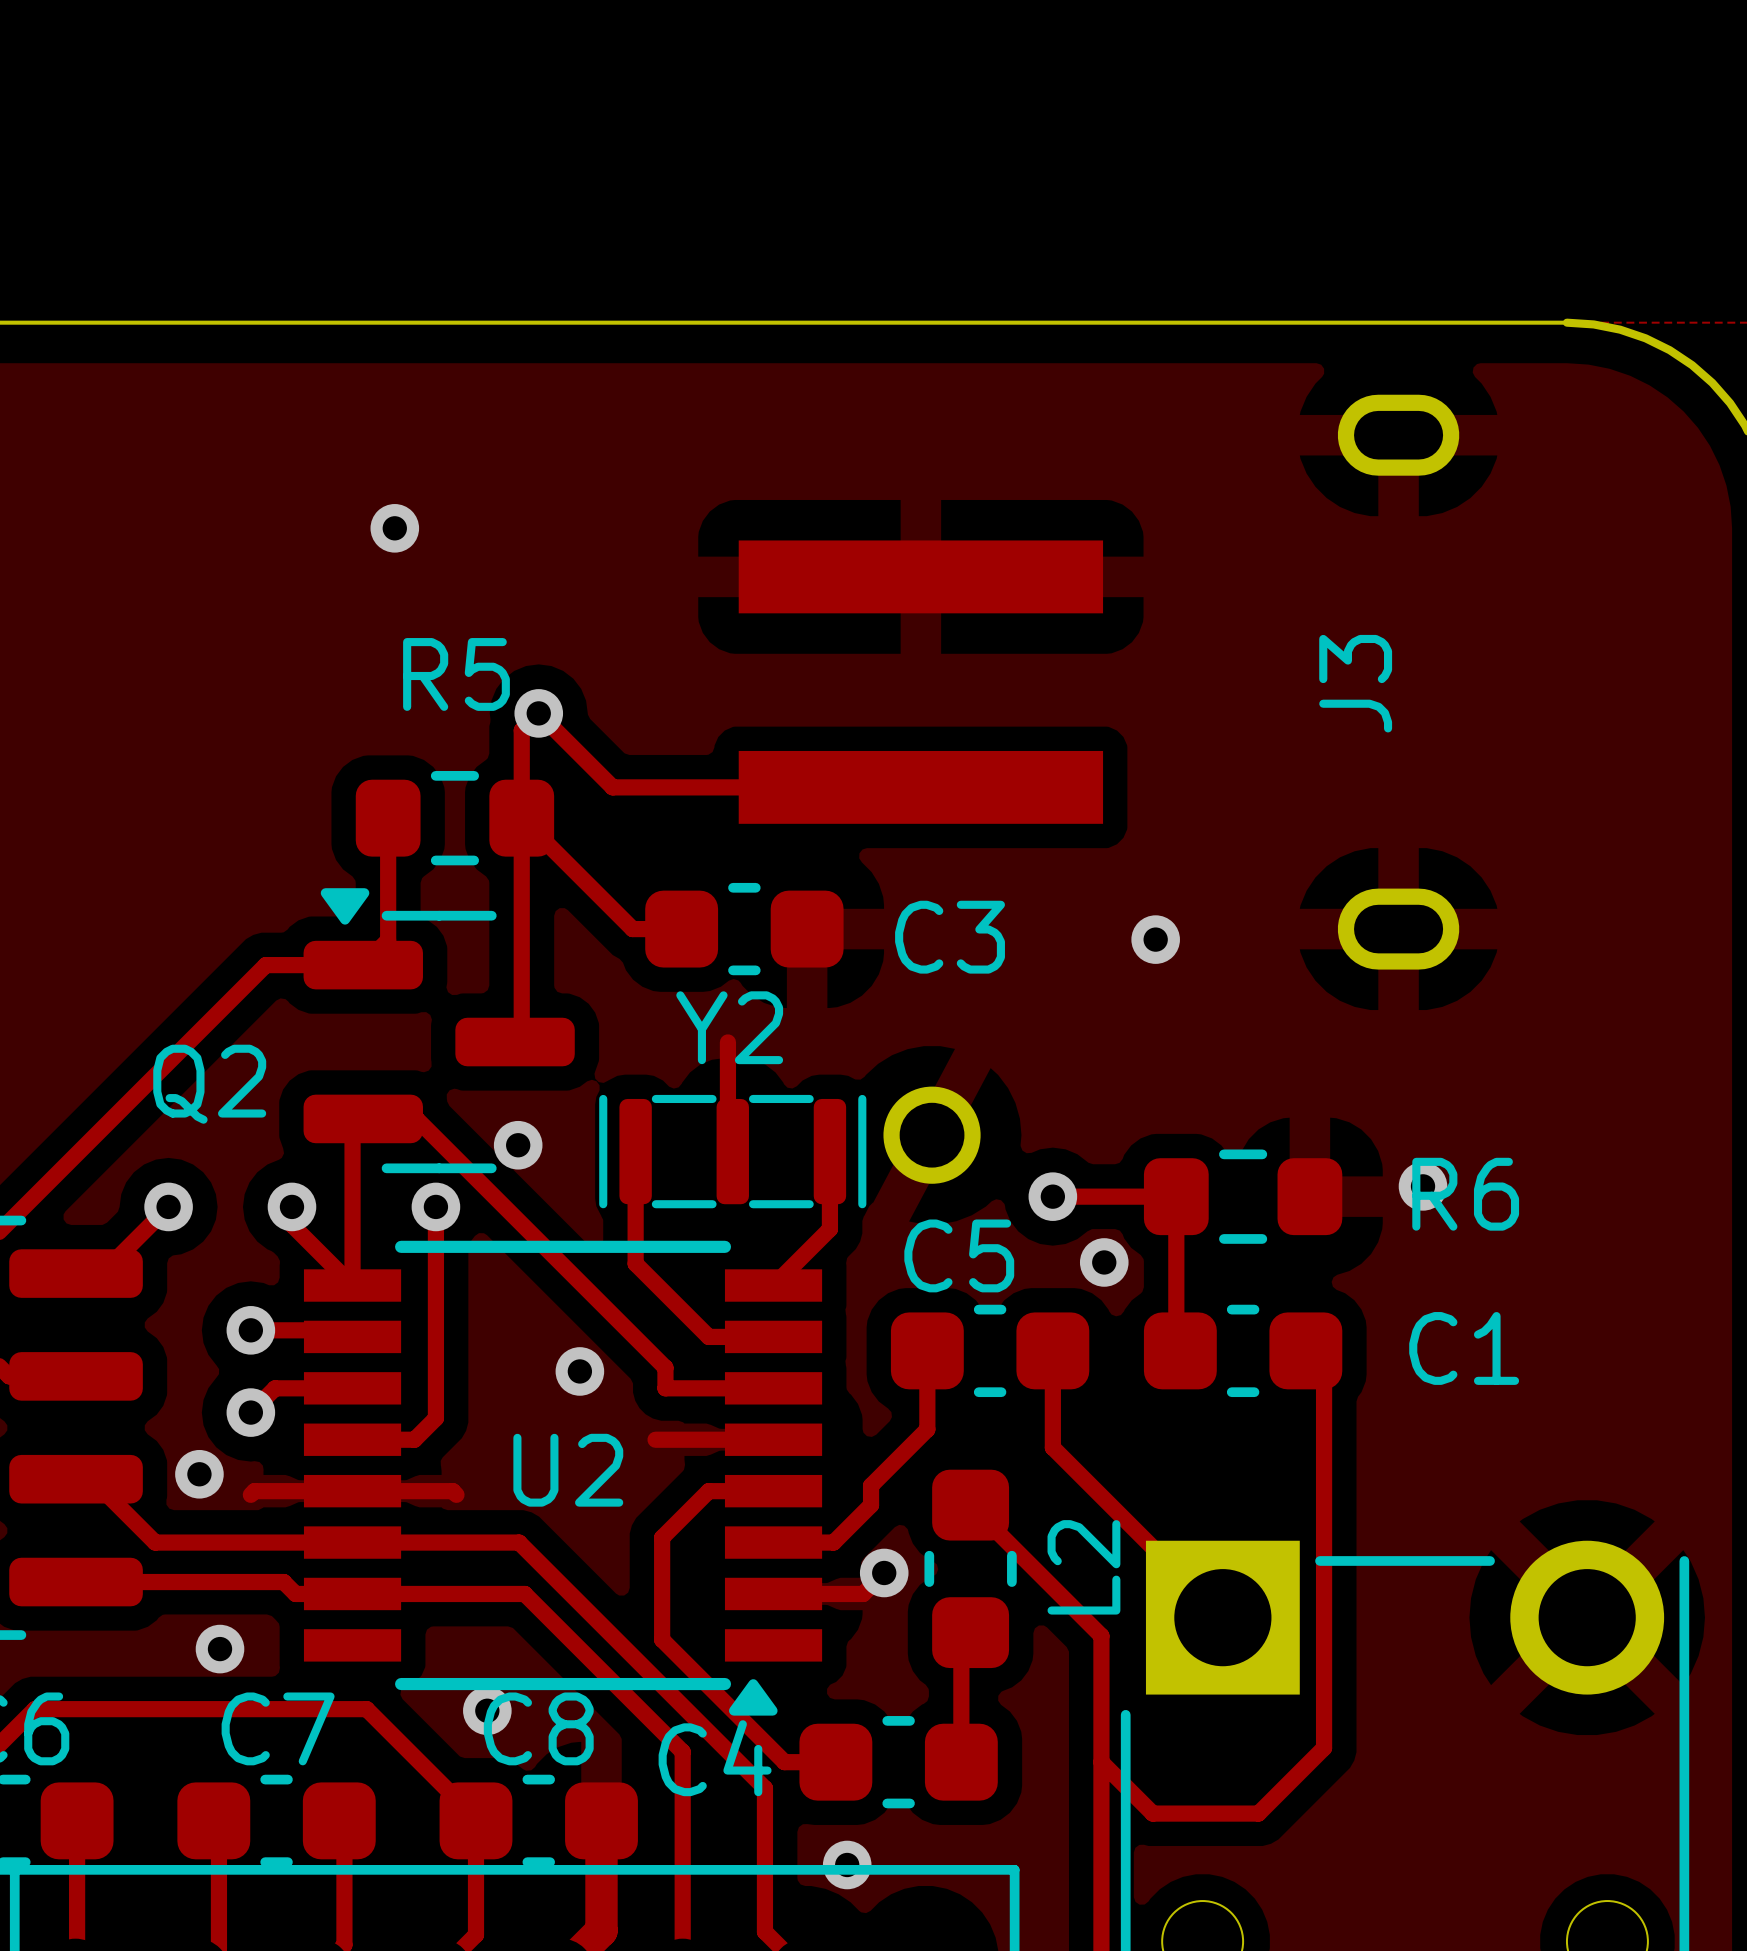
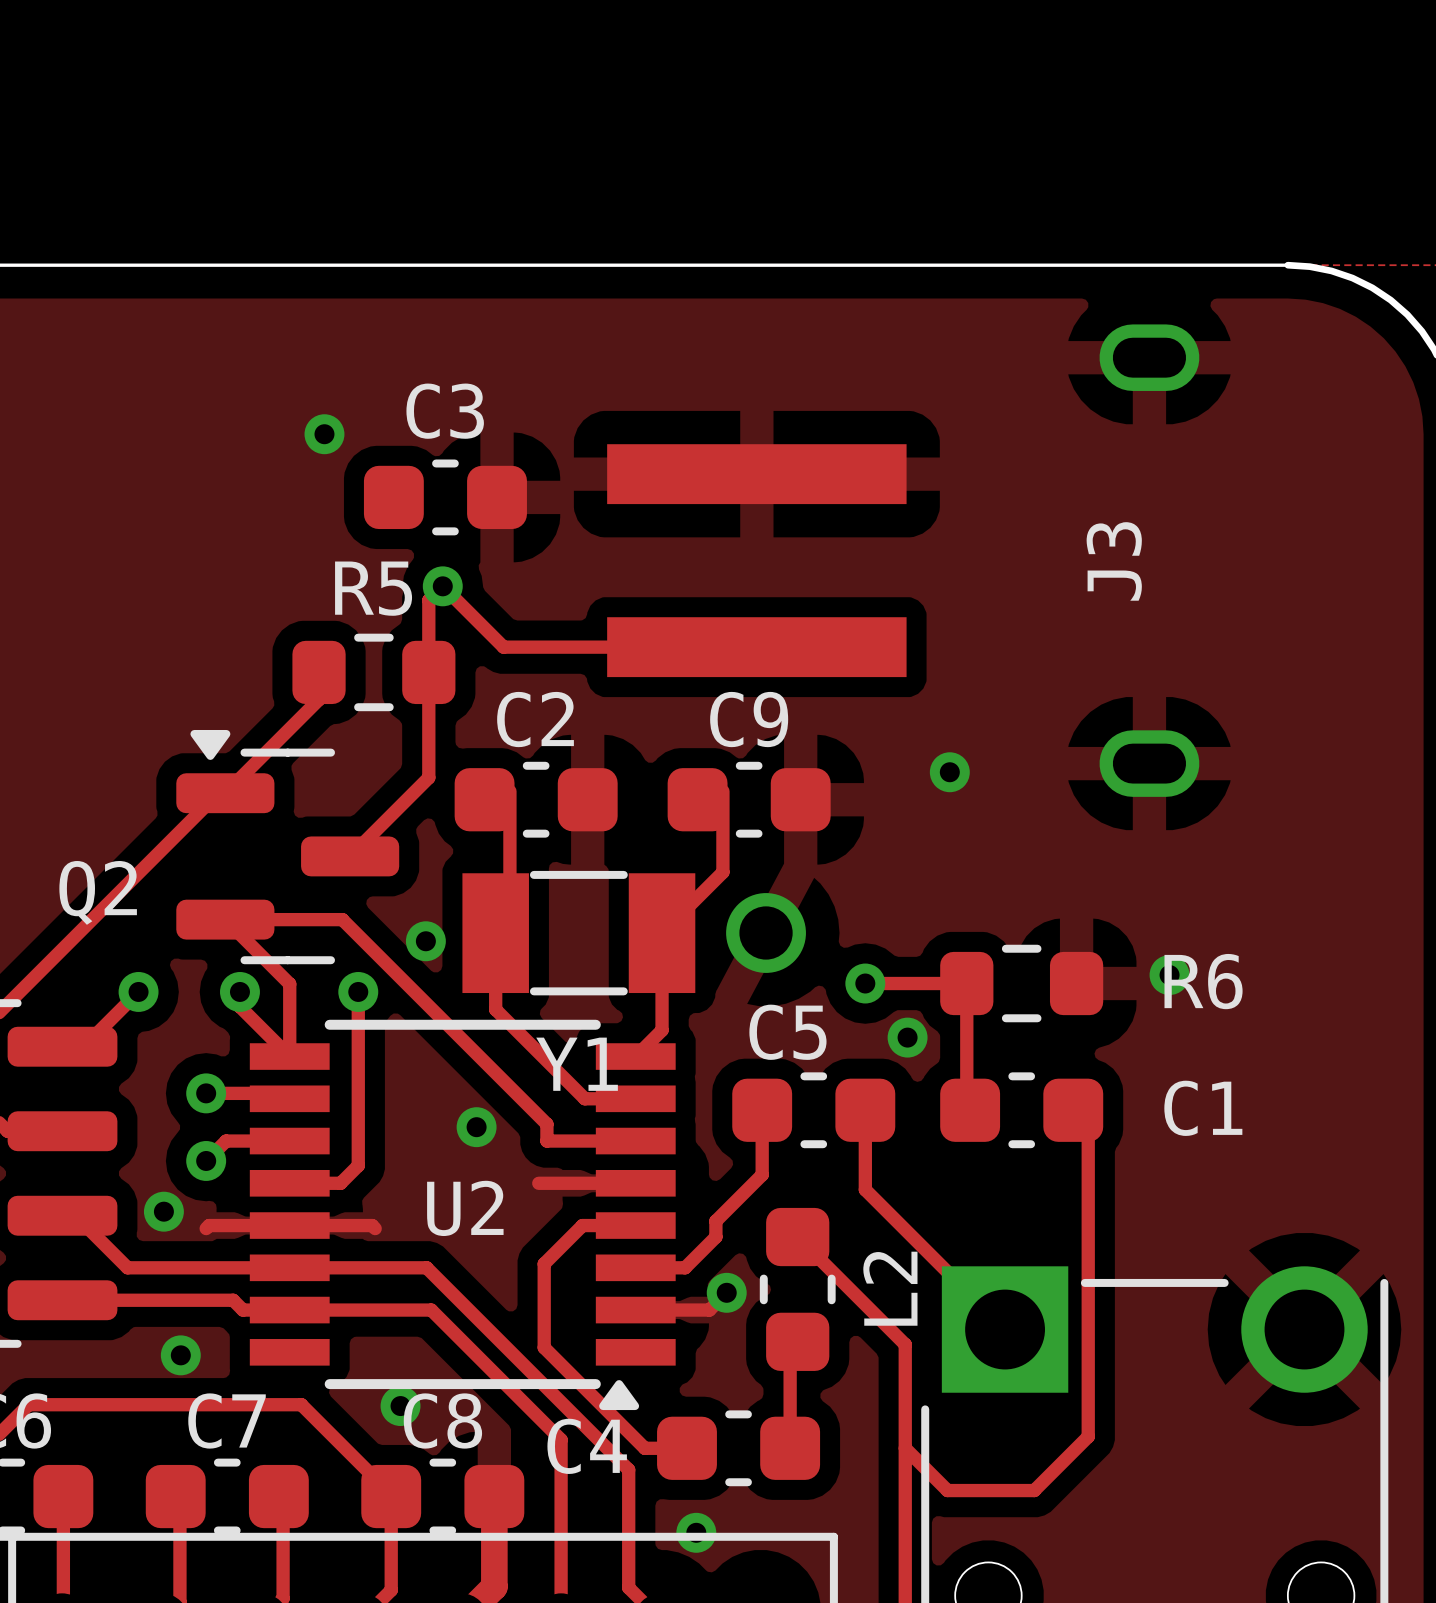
R5 name position: R5 (456, 674) -> R5 (373, 588)
track: (521, 818) (632, 929) (681, 929) -> none
track: (388, 851) (388, 940) (363, 965) (274, 965) -> (319, 699) (225, 793)
C3 position: (744, 929) -> (445, 497)
C3 name position: C3 (950, 937) -> C3 (445, 411)
track: (521, 946) (521, 1035) (515, 1042) -> (428, 777) (350, 856)
C2: none -> (536, 799)
C9: none -> (749, 799)
Q2 position: (439, 1030) -> (287, 847)
track: (727, 1042) (727, 1146) (732, 1151) -> none
track: (363, 1118) (352, 1129) (352, 1197) -> (298, 919) (225, 919) (289, 984)
Y1: none -> (578, 933)
track: (635, 1151) (635, 1263) (708, 1336) (711, 1336) -> (509, 791) (509, 918) (495, 933) (495, 1009) (584, 1098)
Y2: (732, 1151) -> none
track: (829, 1151) (829, 1229) (805, 1253) -> (722, 791) (722, 872) (662, 933) (662, 1030)

